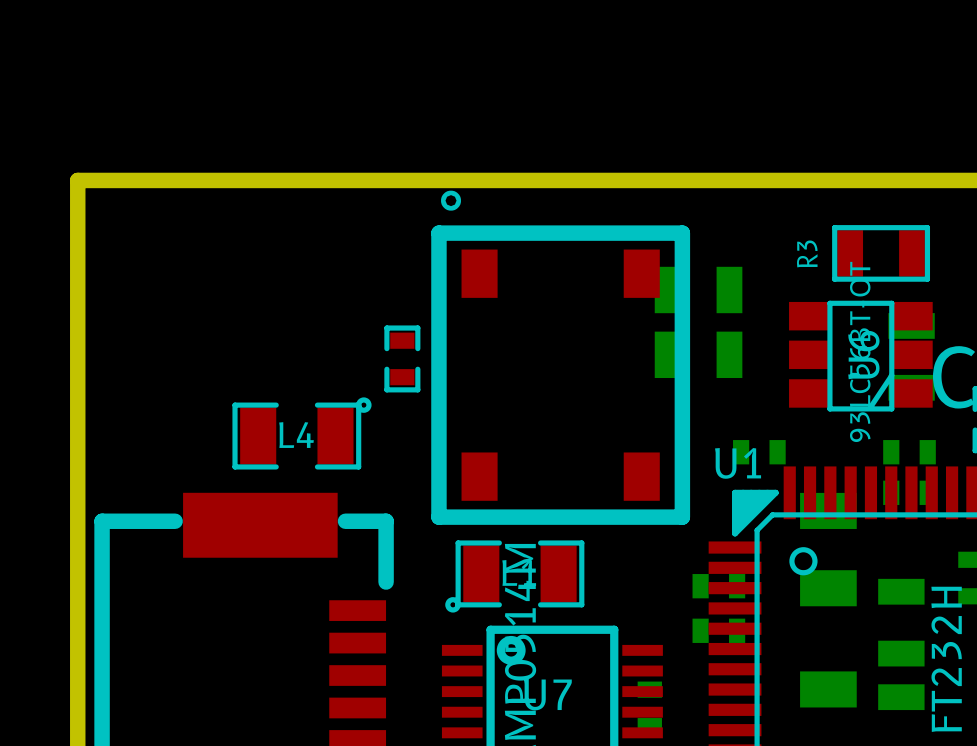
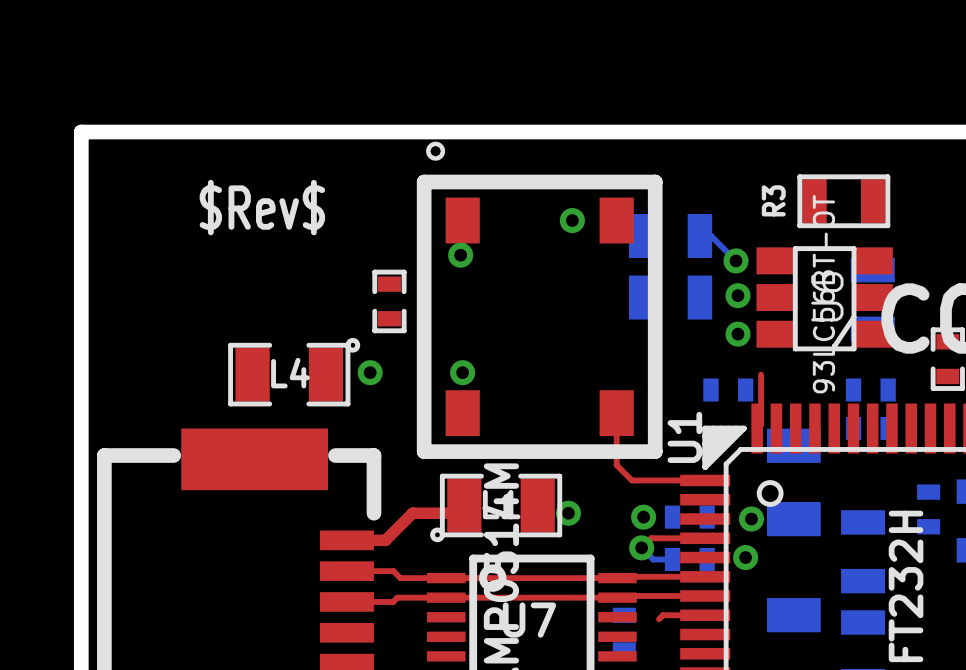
text: none -> $Rev$ (262, 207)
via: none -> (572, 220)
bottom track: none -> (699, 236) (711, 236) (736, 260)
via: none -> (460, 255)
via: none -> (736, 260)
via: none -> (737, 295)
via: none -> (737, 334)
via: none -> (370, 372)
via: none -> (462, 372)
top track: none -> (761, 374) (761, 424) (757, 428)
U1 name rotation: 0° (738, 463) -> 90° counterclockwise (684, 437)
top track: none -> (616, 413) (616, 465) (631, 480) (705, 480)
top track: none -> (456, 513) (412, 513) (385, 540) (346, 540)
via: none -> (568, 513)
via: none -> (643, 517)
via: none -> (751, 519)
top track: none -> (705, 538) (651, 538) (641, 547)
bottom track: none -> (641, 547) (653, 559) (672, 559)
via: none -> (641, 547)
via: none -> (745, 557)
top track: none -> (346, 571) (393, 571) (400, 578) (705, 576)
top track: none -> (705, 596) (397, 597) (393, 601) (346, 601)
top track: none -> (705, 615) (662, 615) (659, 619)

